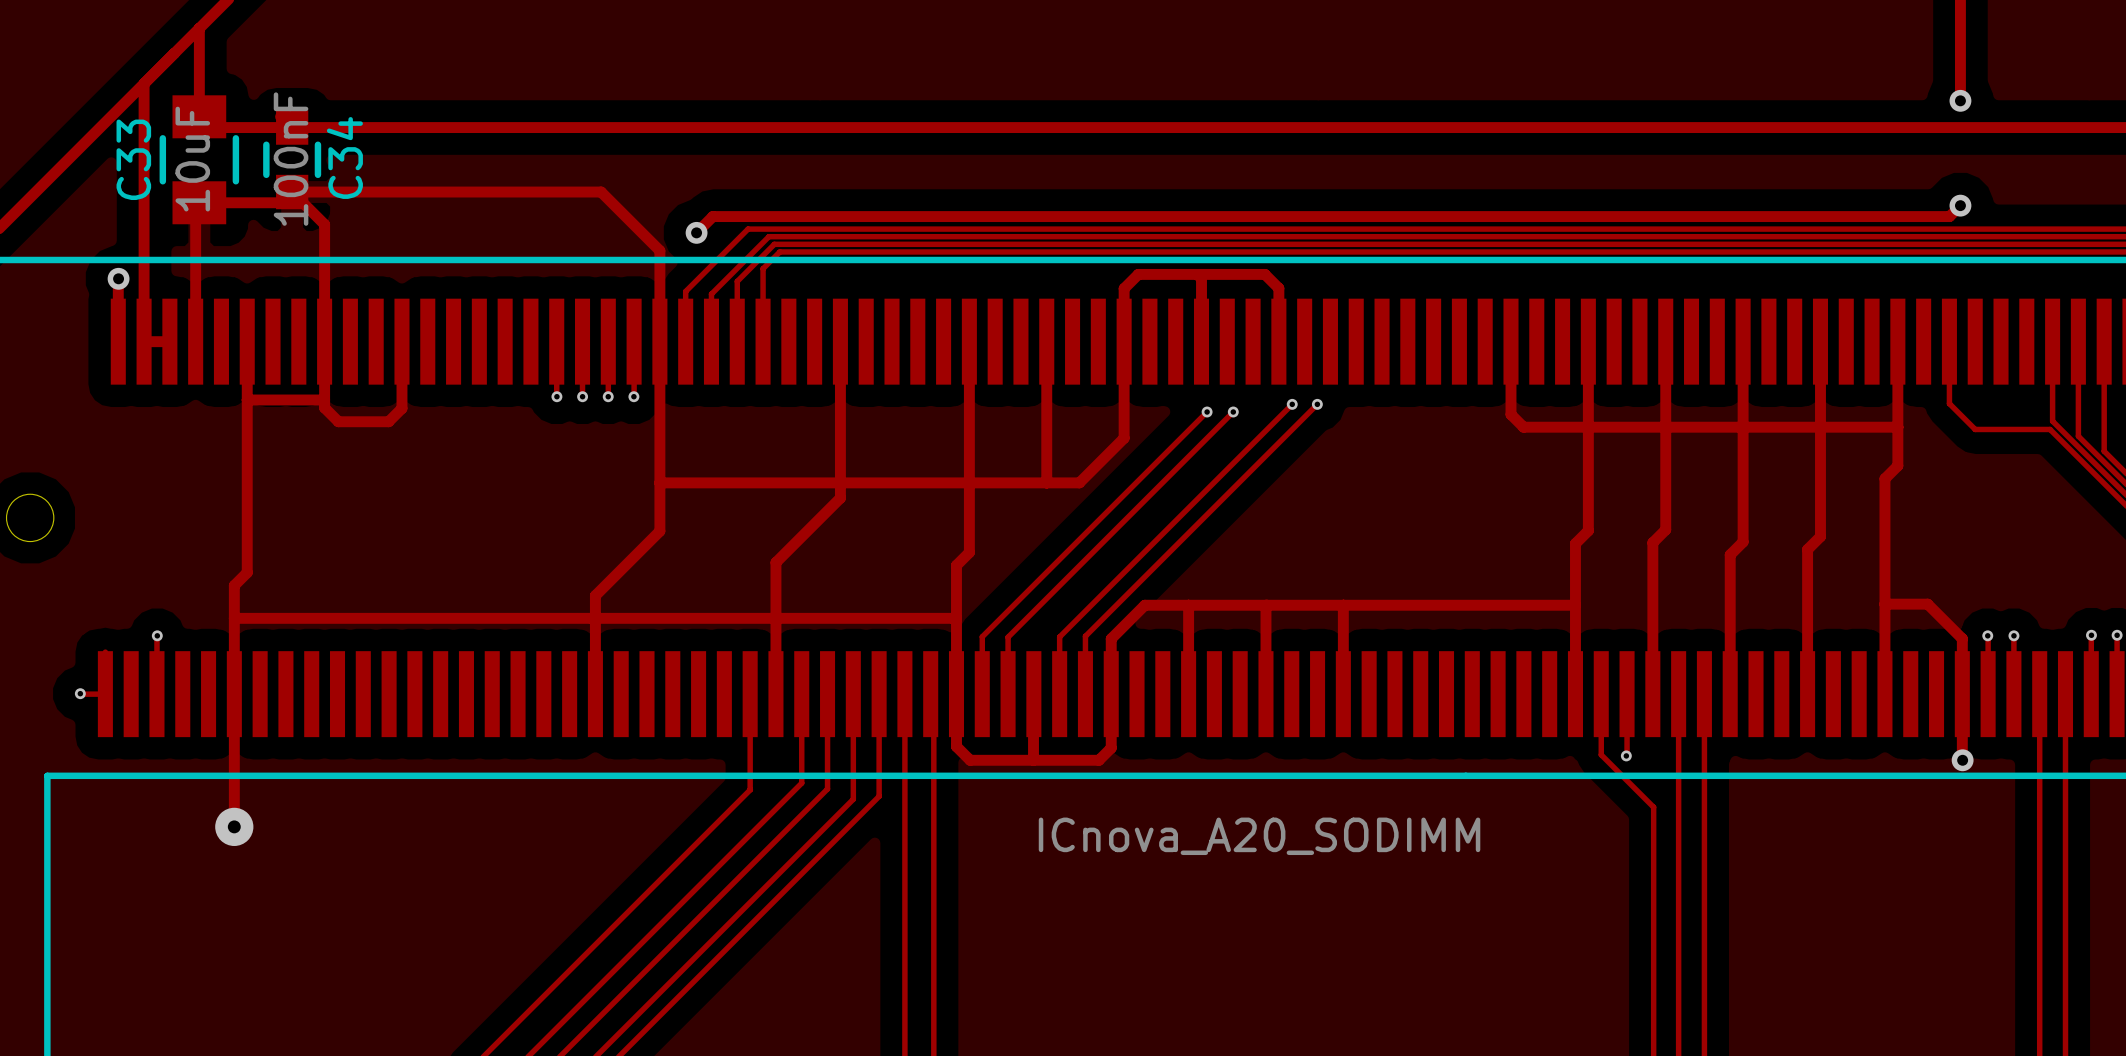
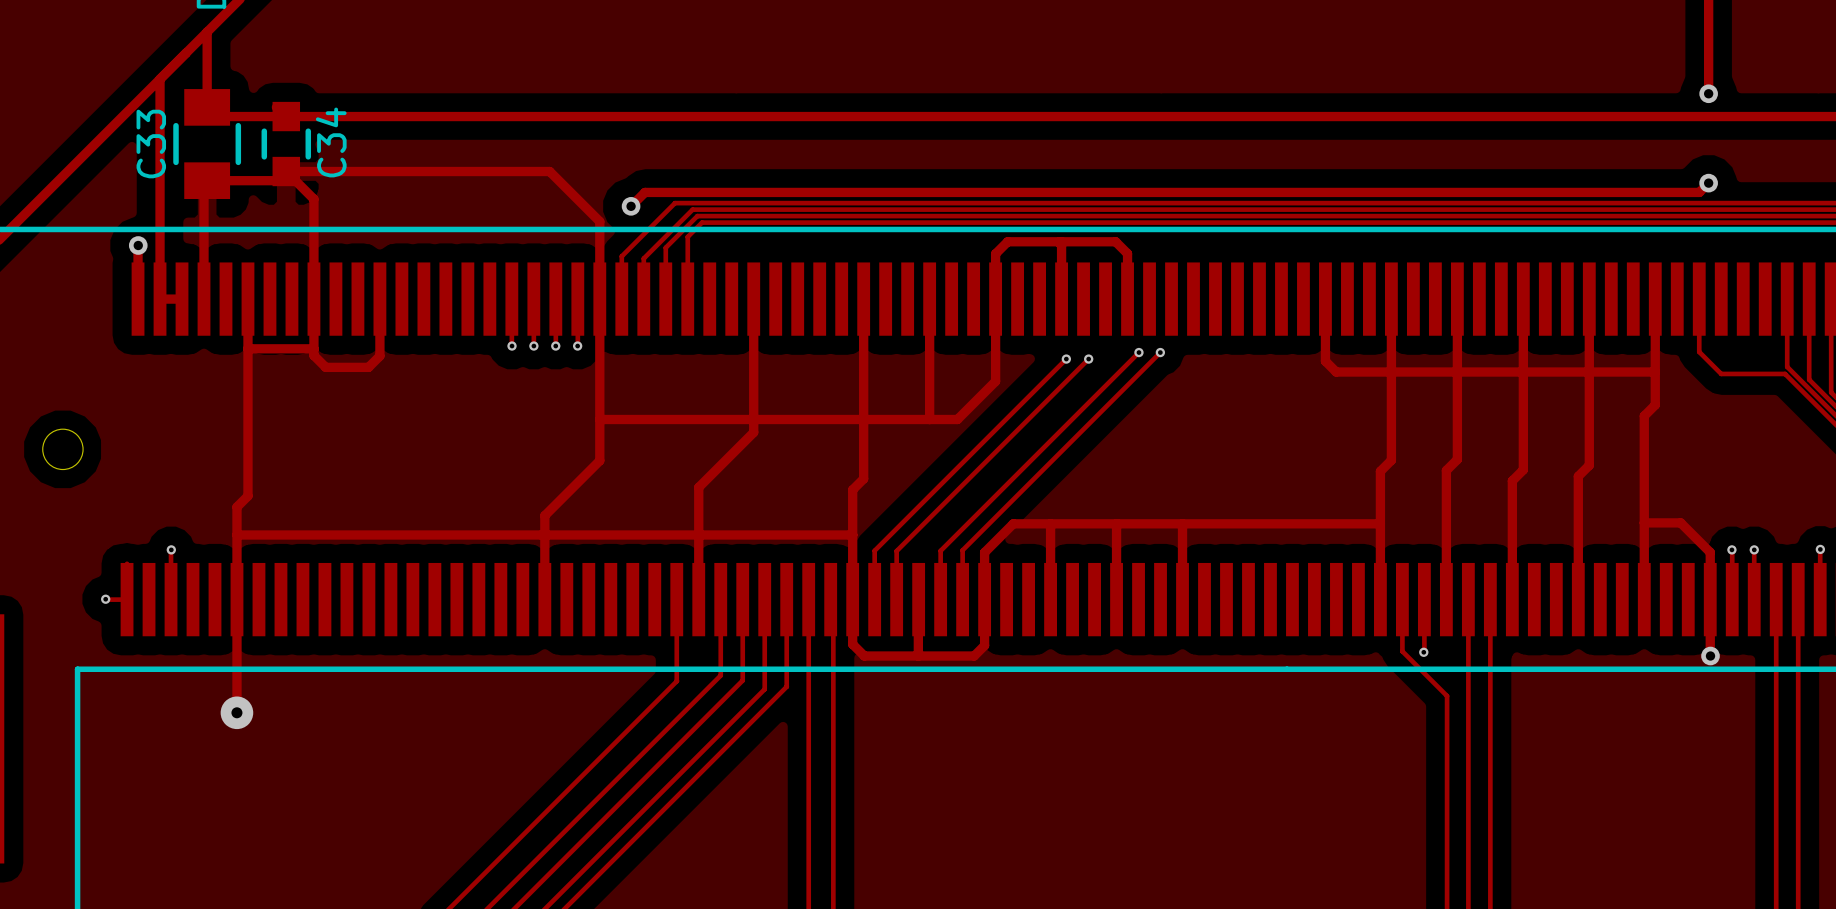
C33 value: 10uF (192, 159) -> none
C34 value: 100nF (291, 159) -> none
part value: ICnova_A20_SODIMM (1259, 836) -> none

